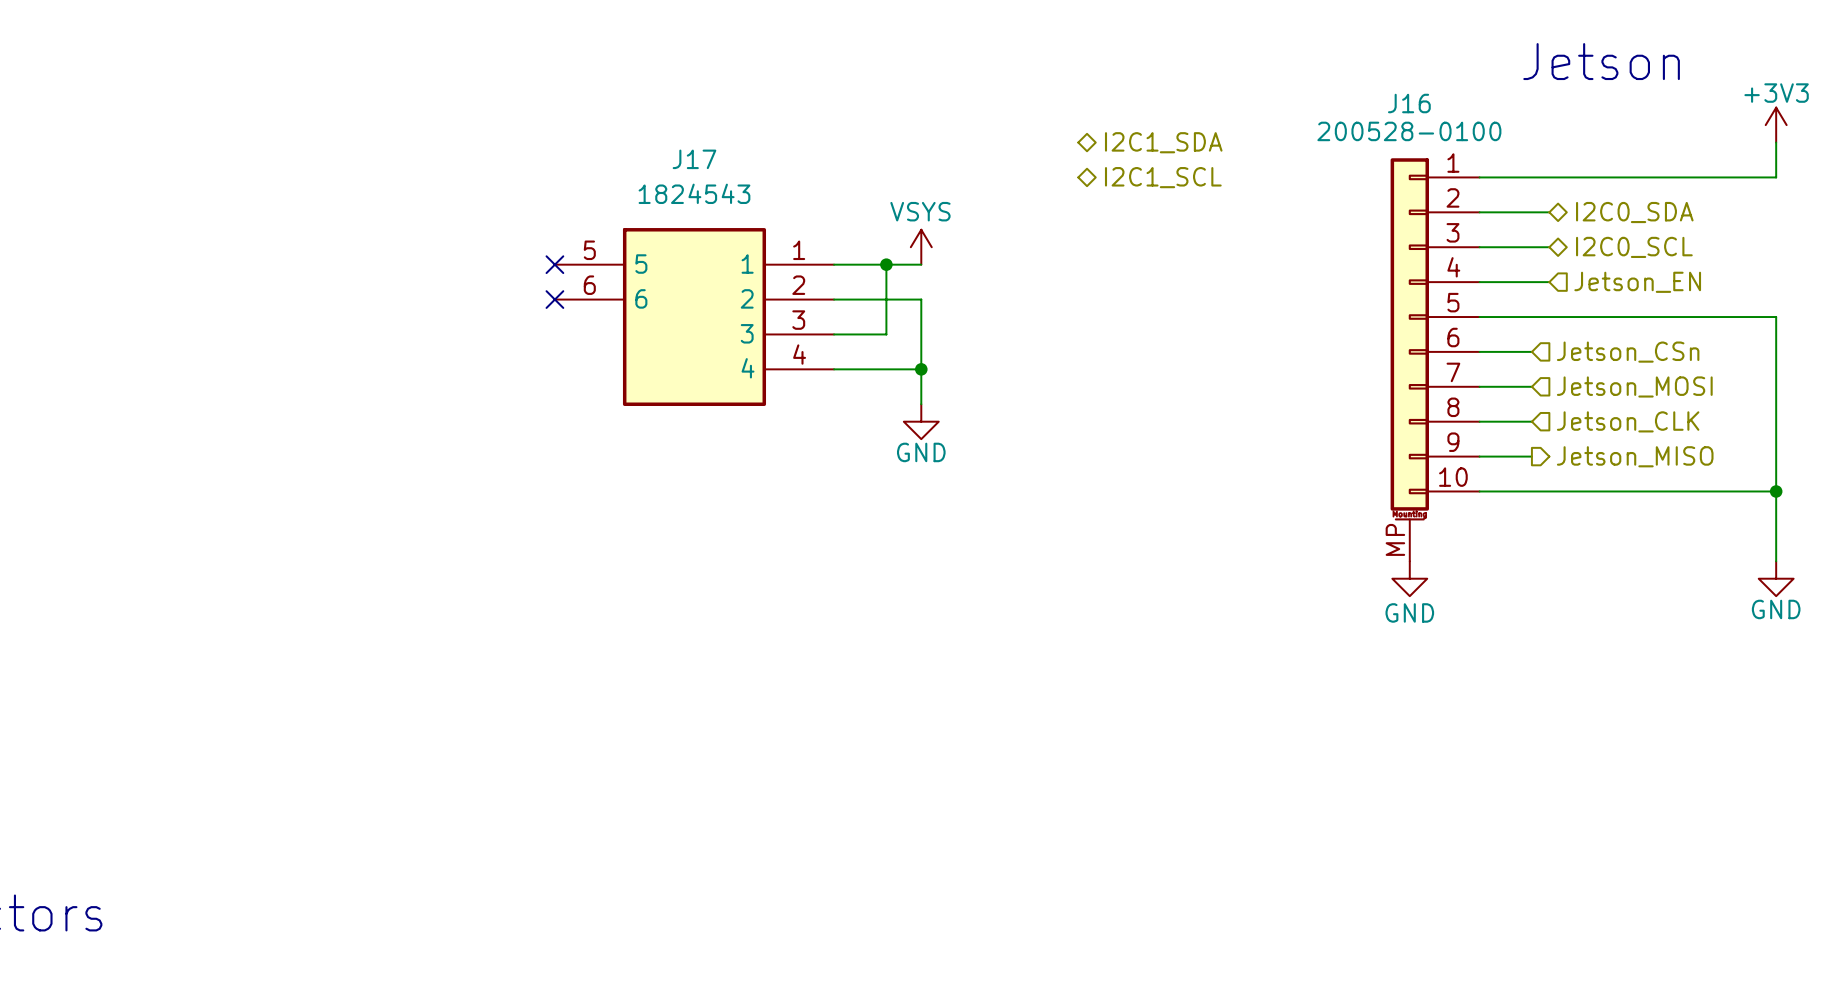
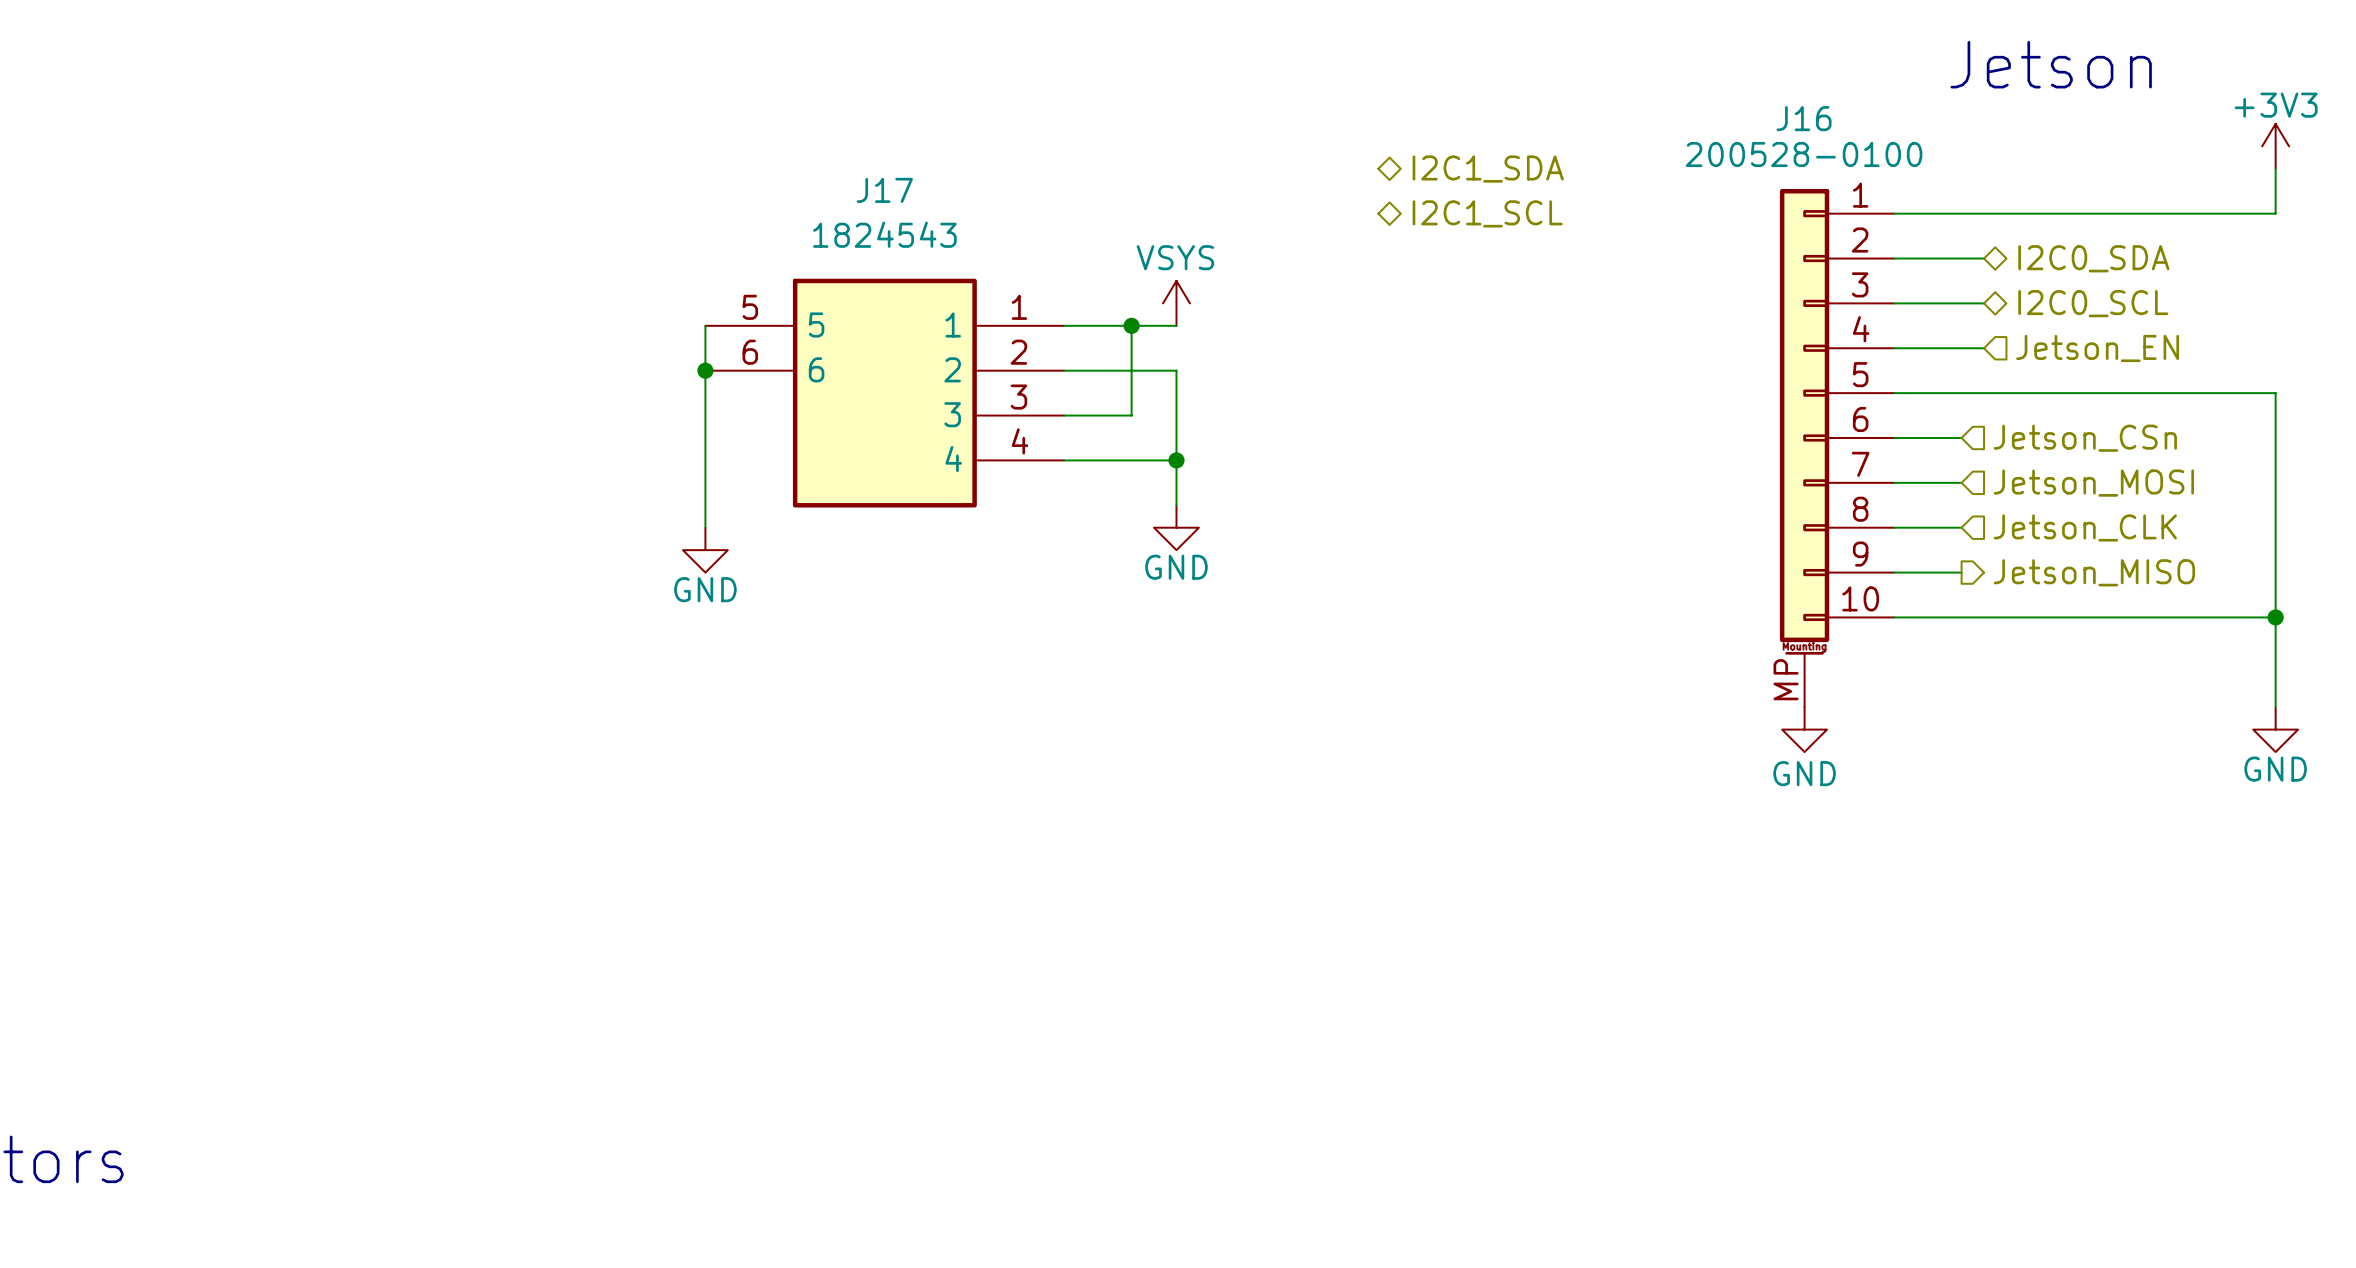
wire: none -> (705, 325) (705, 527)
no-connect mark: (554, 264) -> none
no-connect mark: (554, 299) -> none
junction: none -> (705, 370)
power symbol: none -> GND (705, 550)

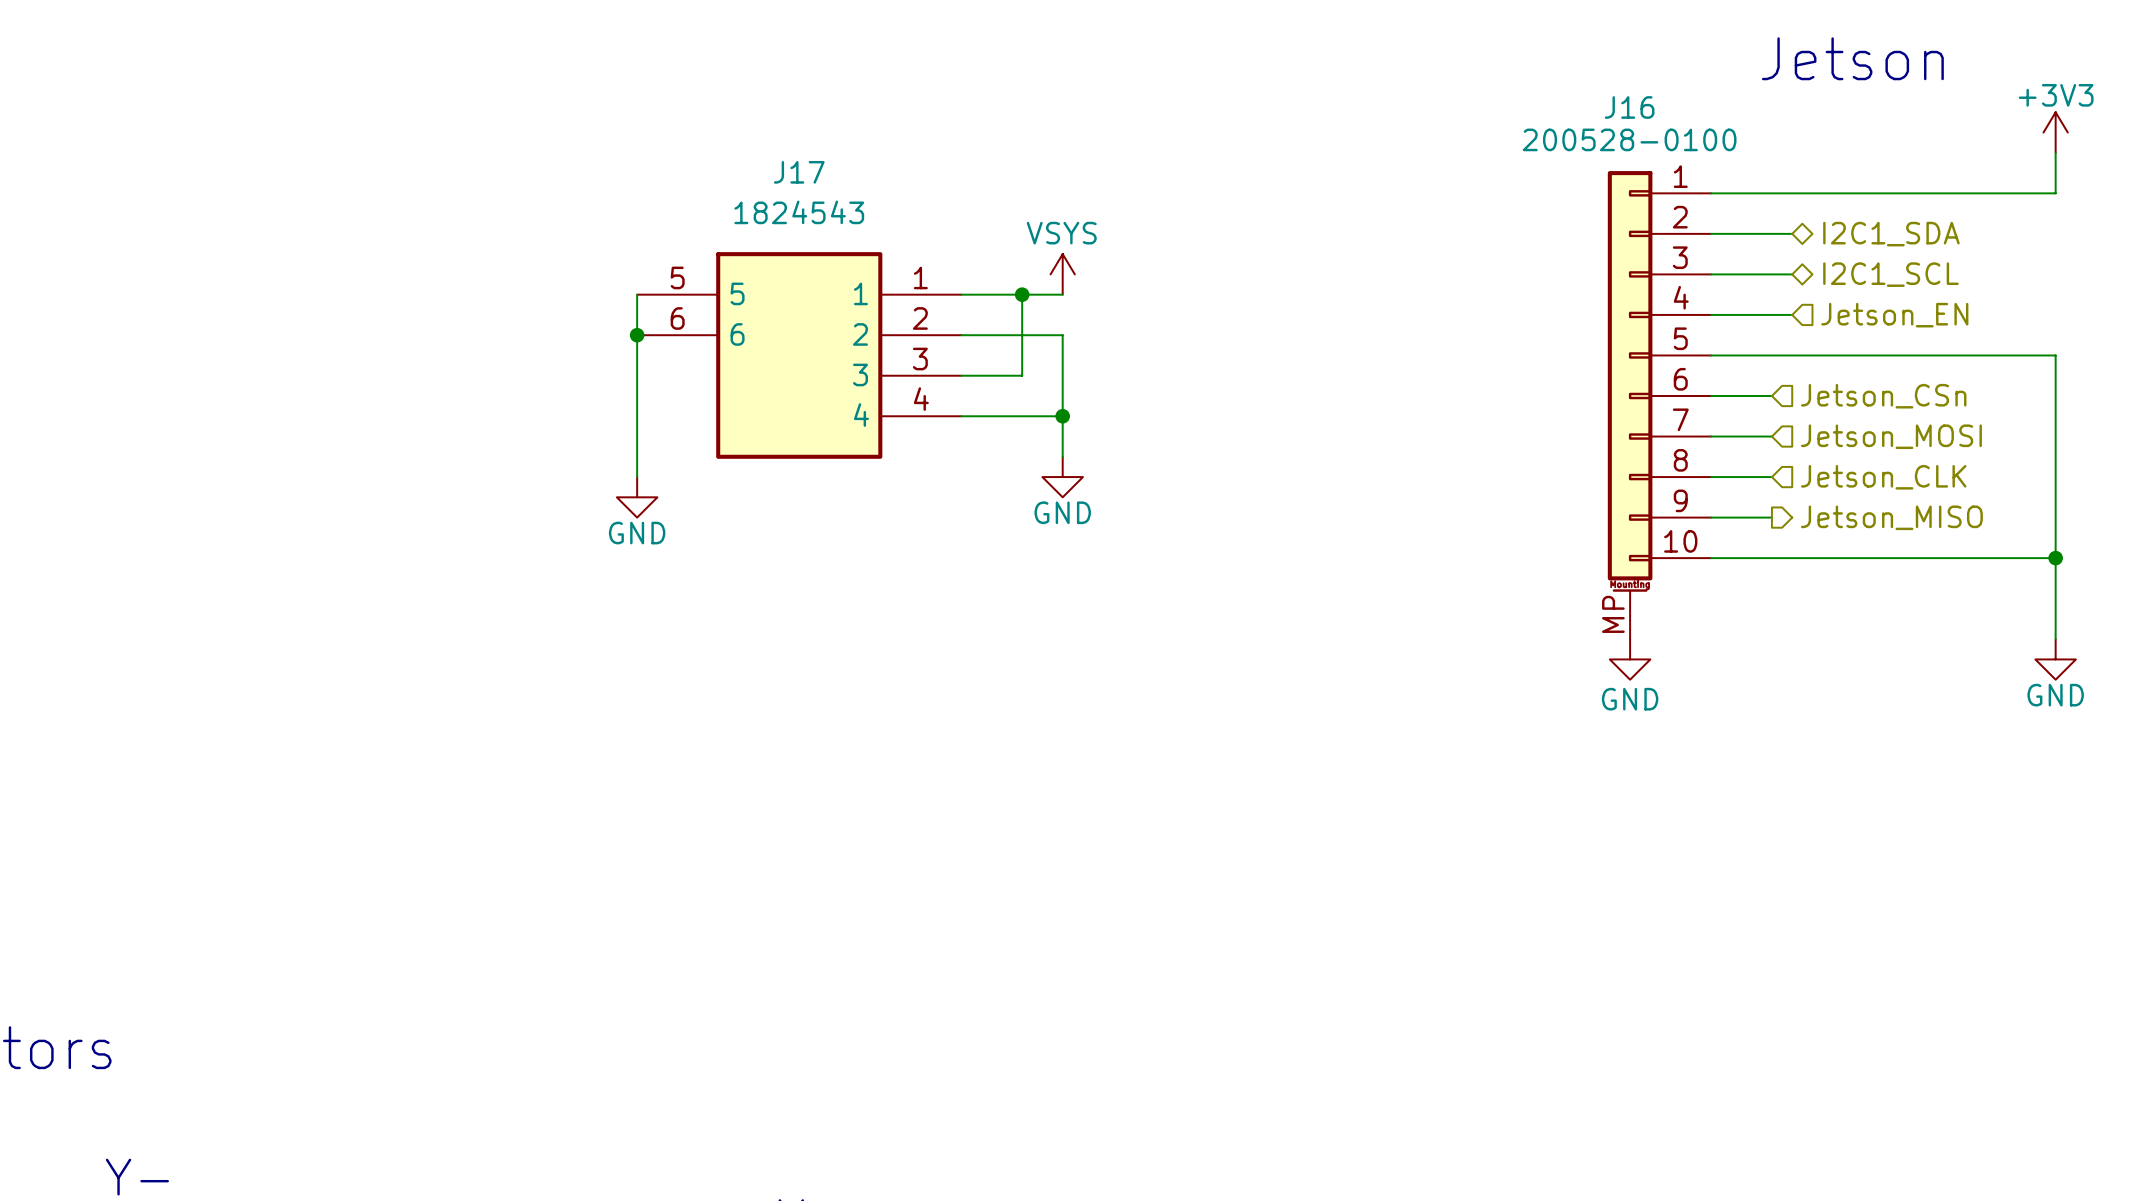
hierarchical label: I2C1_SDA (1488, 169) -> none
hierarchical label: I2C1_SCL (1487, 213) -> none
hierarchical label: I2C0_SDA (2093, 258) -> I2C1_SDA (1891, 234)
hierarchical label: I2C0_SCL (2093, 303) -> I2C1_SCL (1890, 274)

